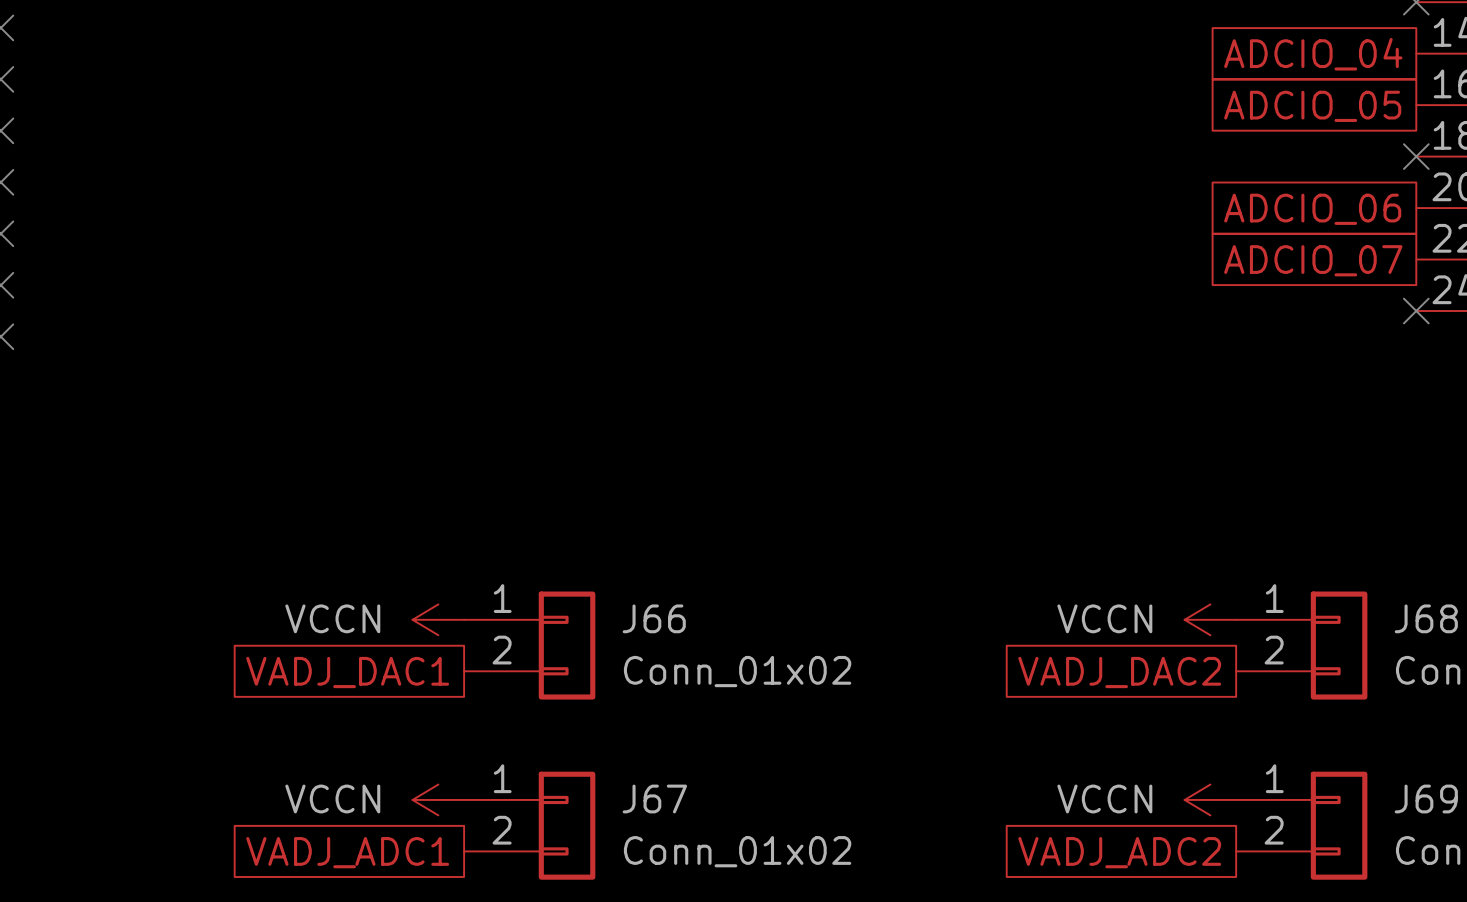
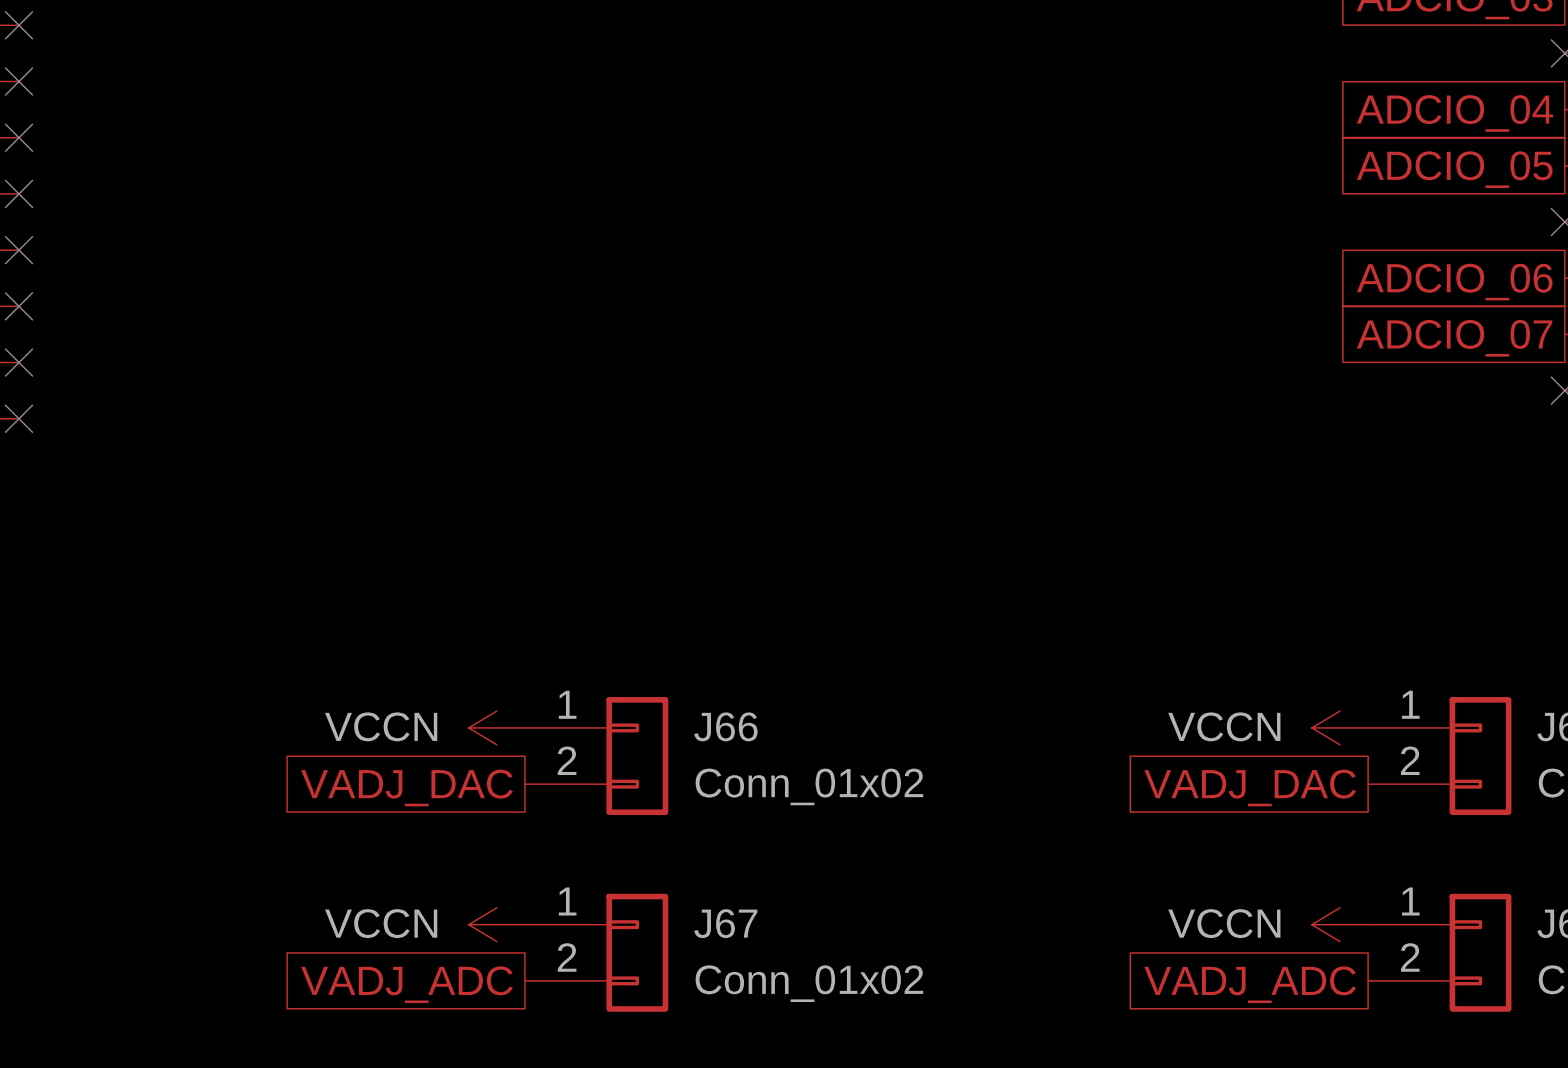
global label: VADJ_DAC1 (347, 672) -> VADJ_DAC (406, 788)
global label: VADJ_DAC2 (1119, 672) -> VADJ_DAC (1250, 788)
global label: VADJ_ADC1 (347, 852) -> VADJ_ADC (406, 984)
global label: VADJ_ADC2 (1119, 852) -> VADJ_ADC (1250, 984)

